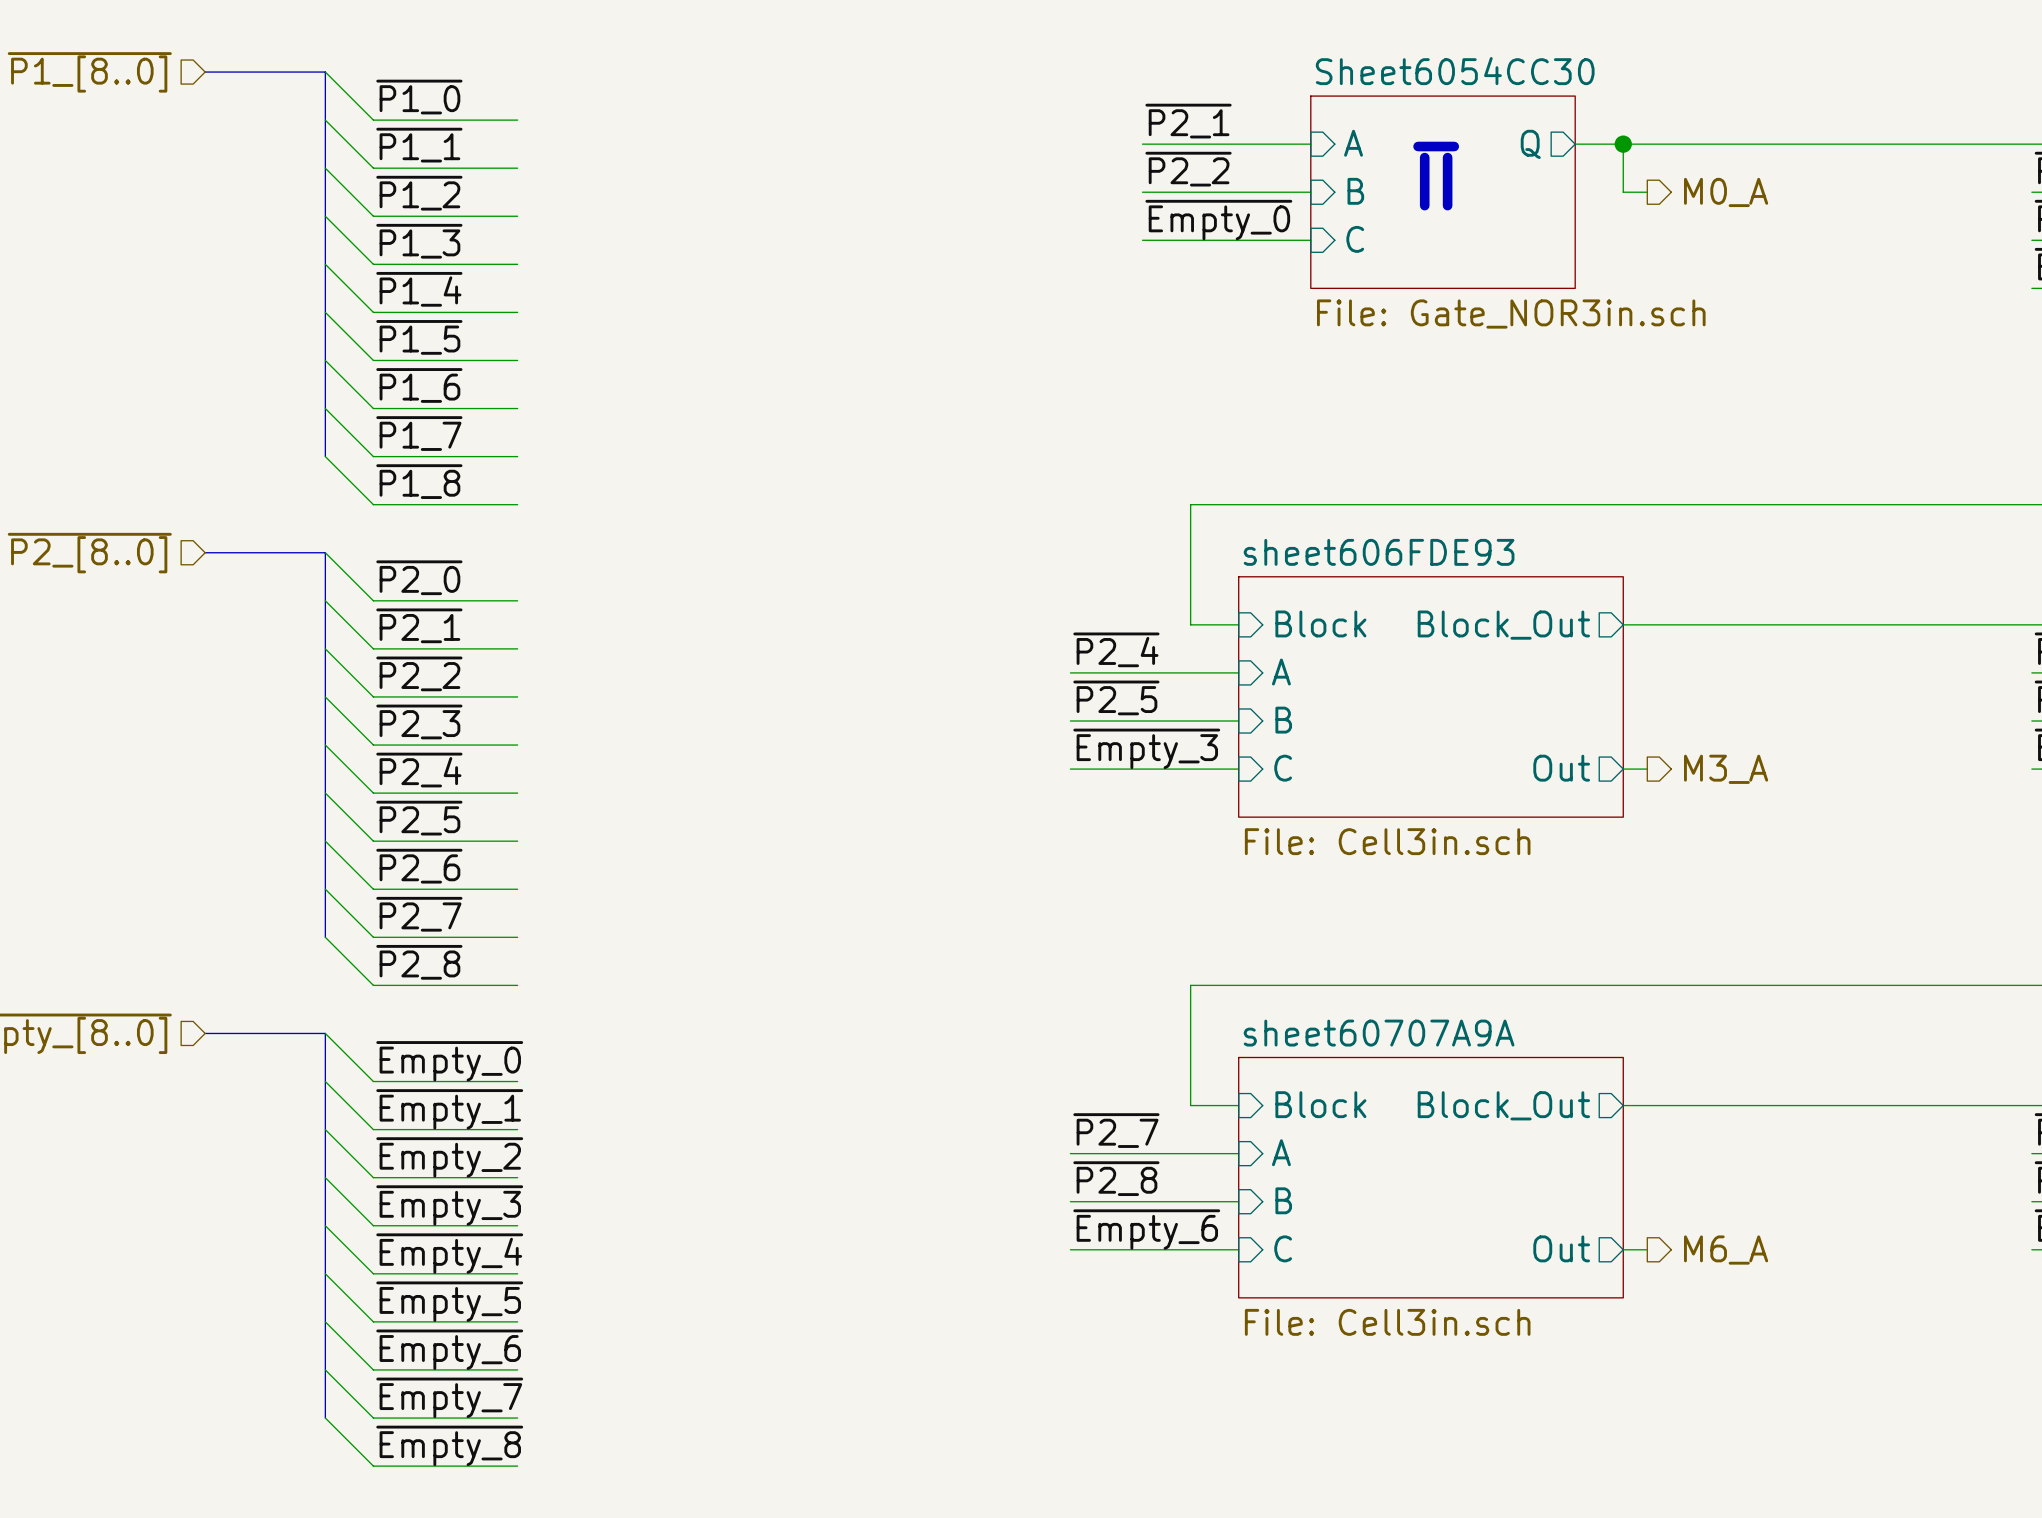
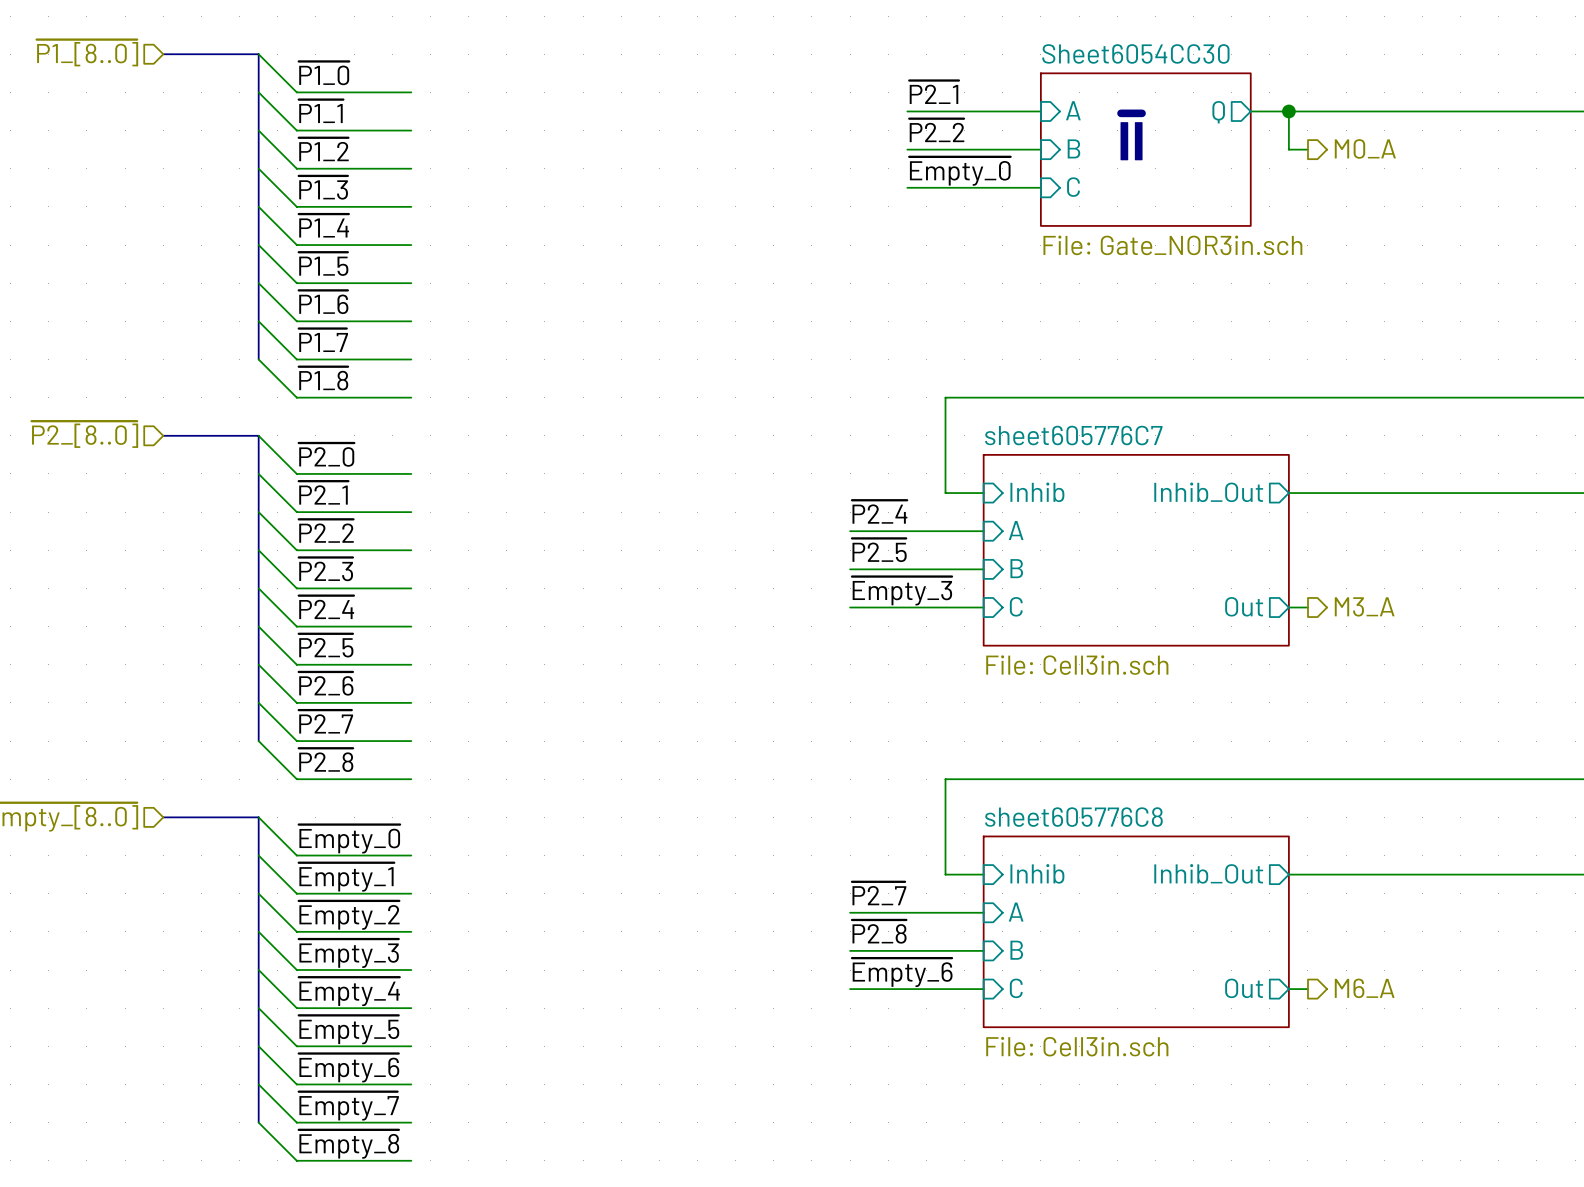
sheet sheet606FDE93 name: sheet606FDE93 (1379, 552) -> sheet605776C7 (1073, 435)
sheet pin: Block (1320, 623) -> Inhib (1037, 492)
sheet pin: Block_Out (1503, 625) -> Inhib_Out (1208, 492)
sheet sheet60707A9A name: sheet60707A9A (1379, 1033) -> sheet605776C8 (1073, 817)
sheet pin: Block (1320, 1104) -> Inhib (1037, 873)
sheet pin: Block_Out (1503, 1105) -> Inhib_Out (1208, 873)

